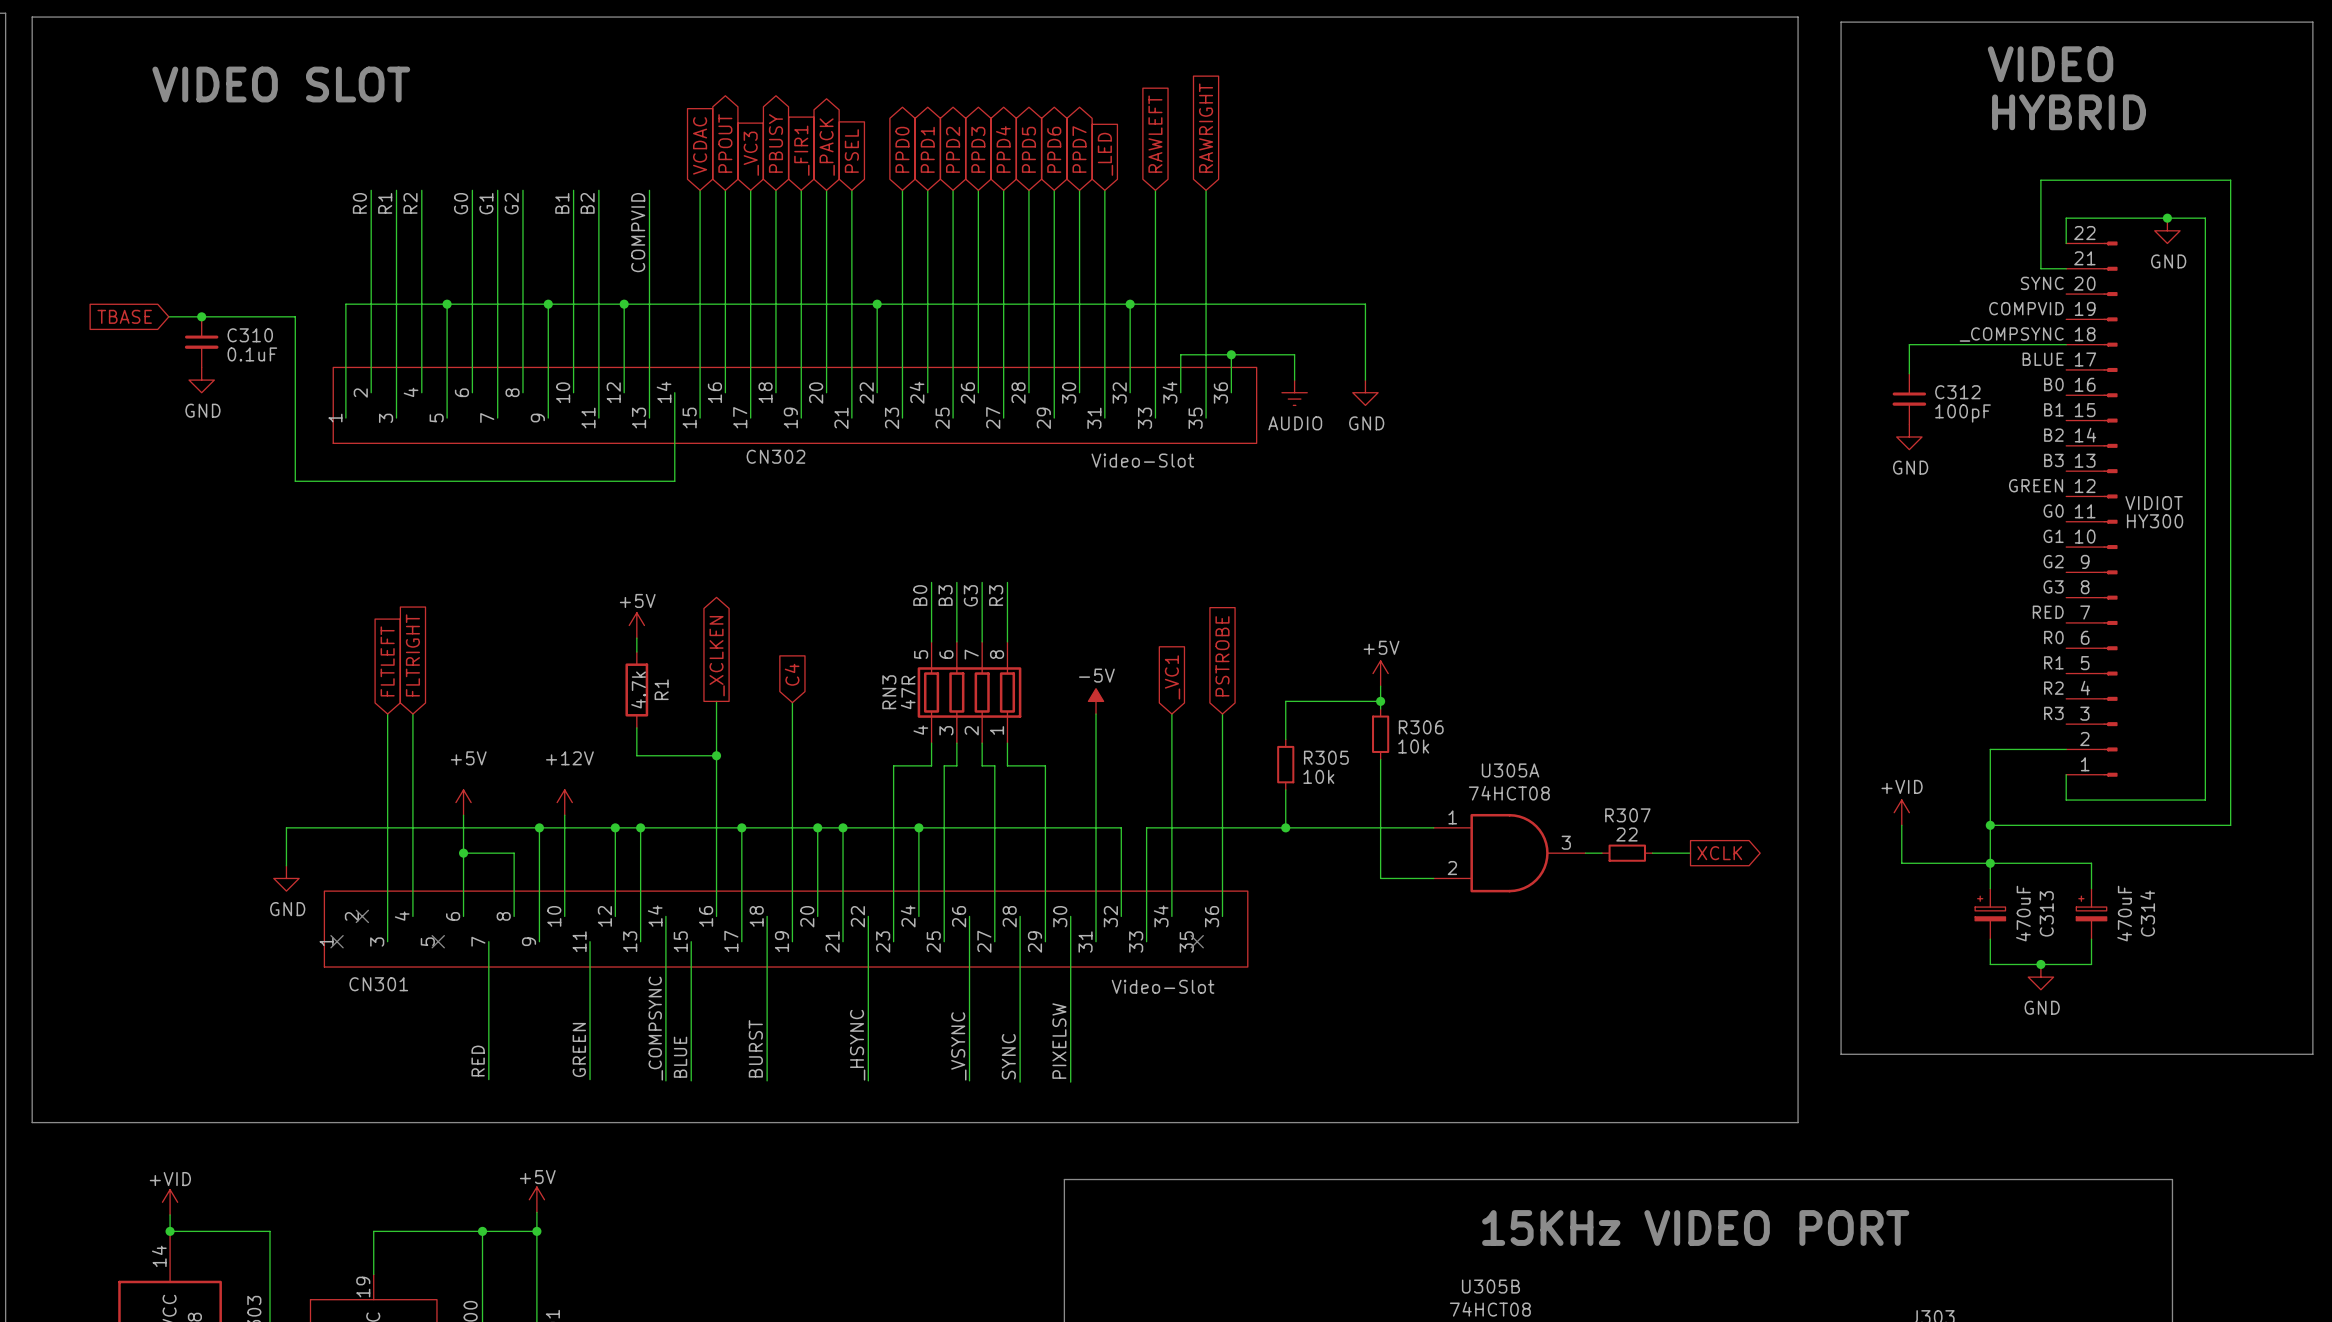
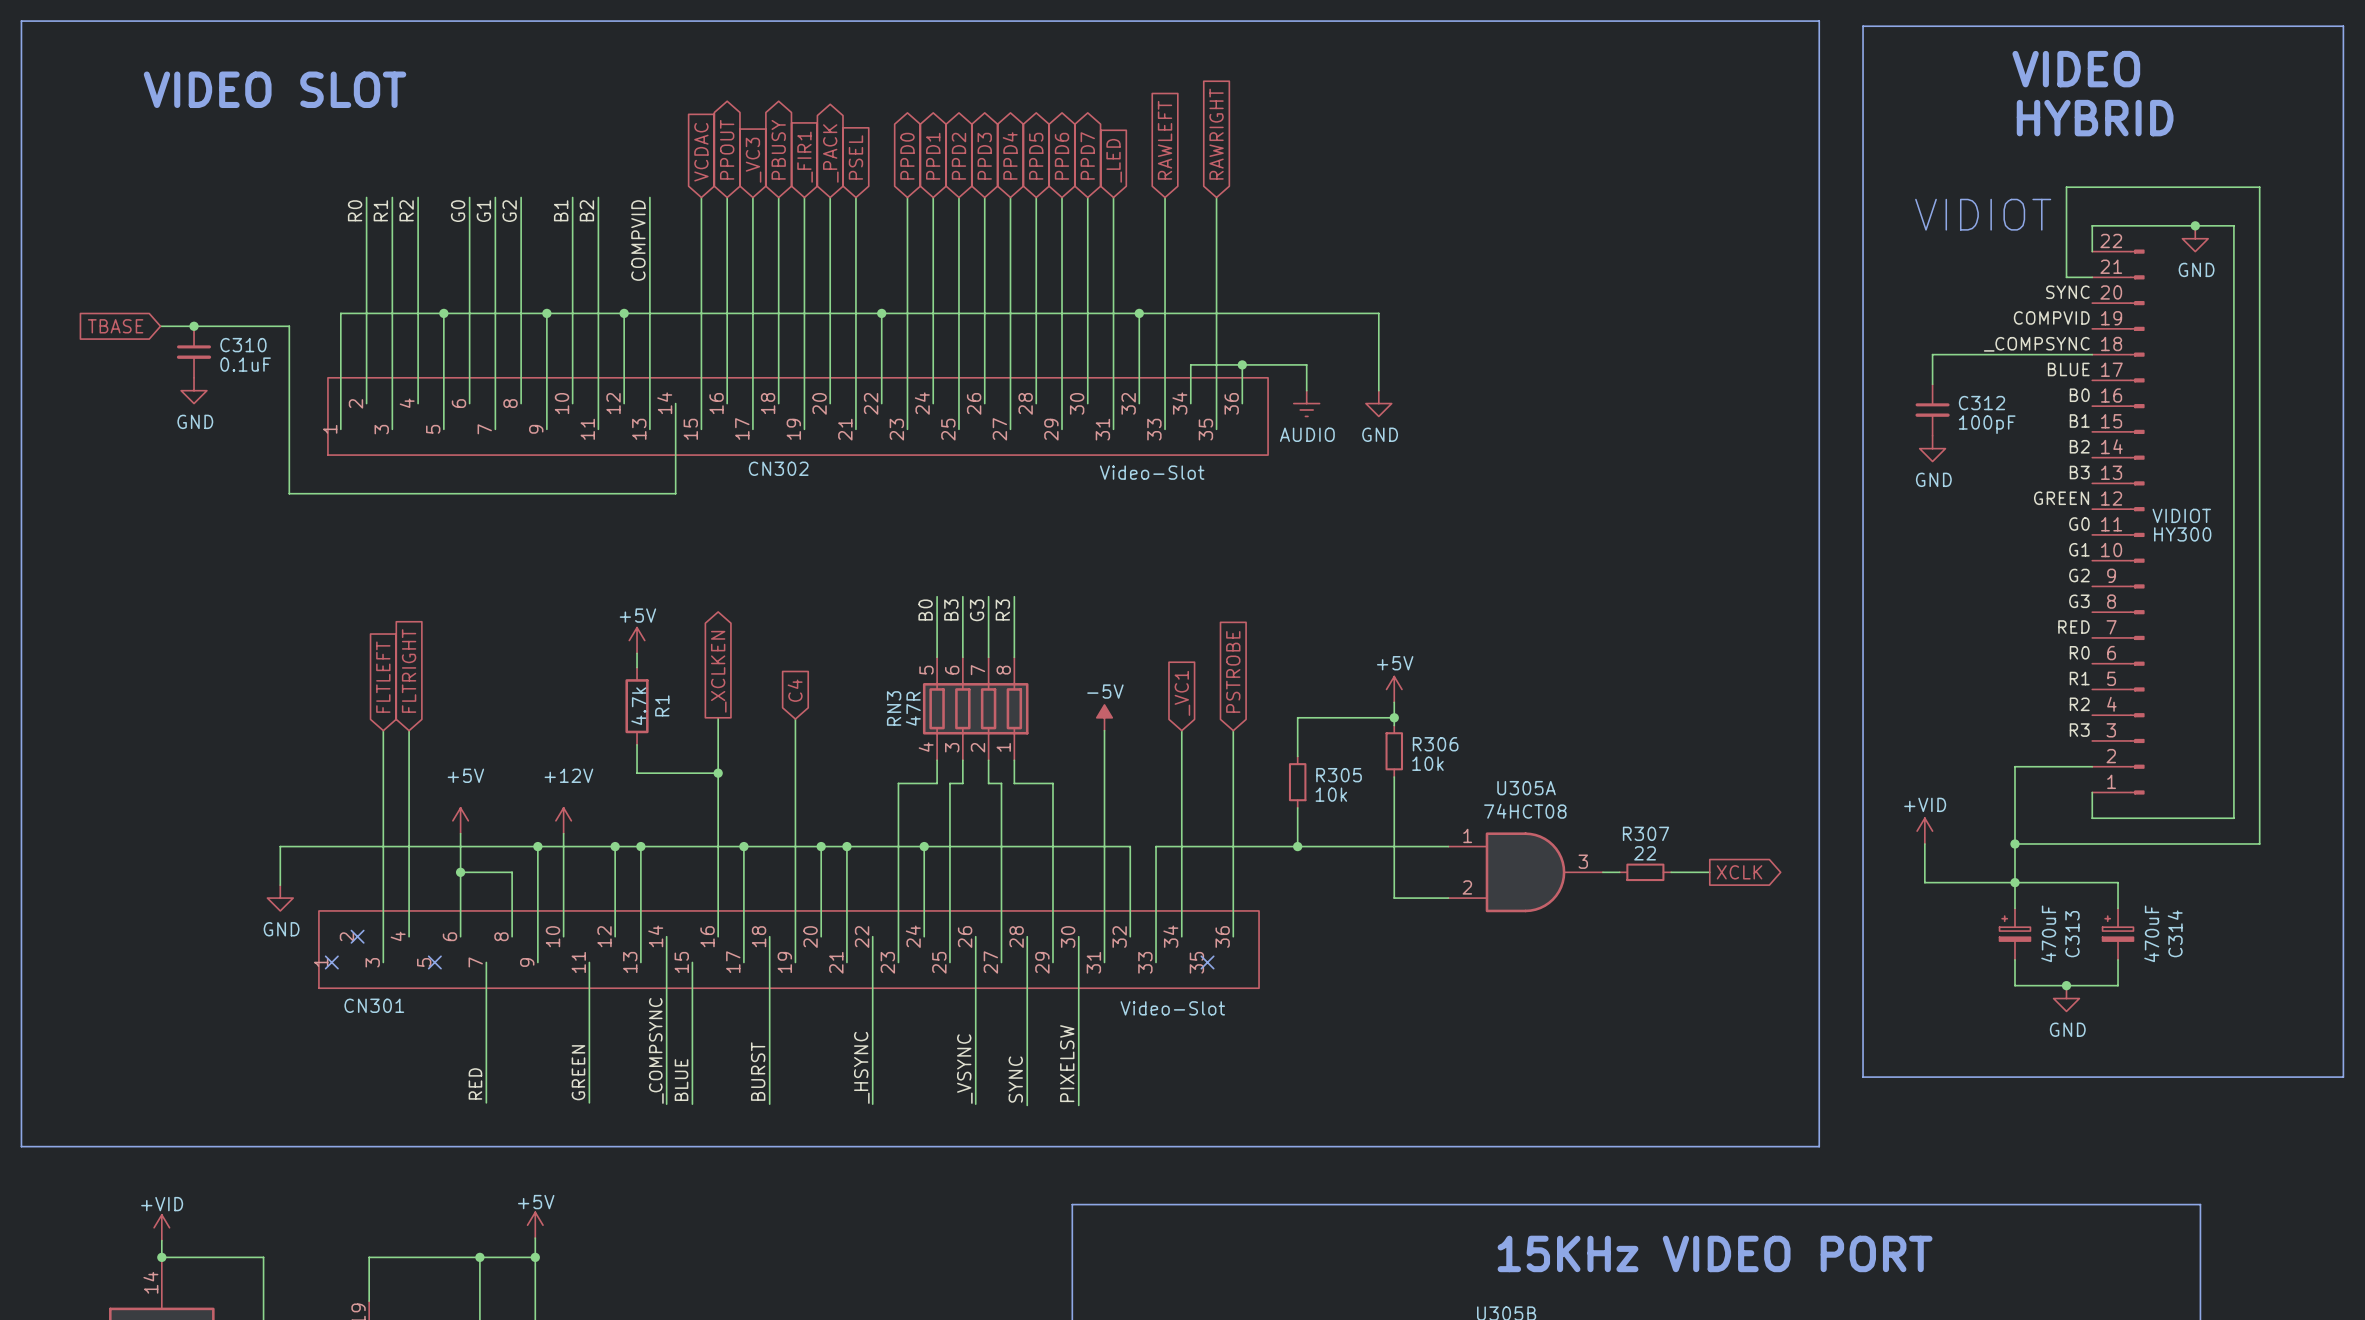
text: none -> VIDIOT (1983, 214)

